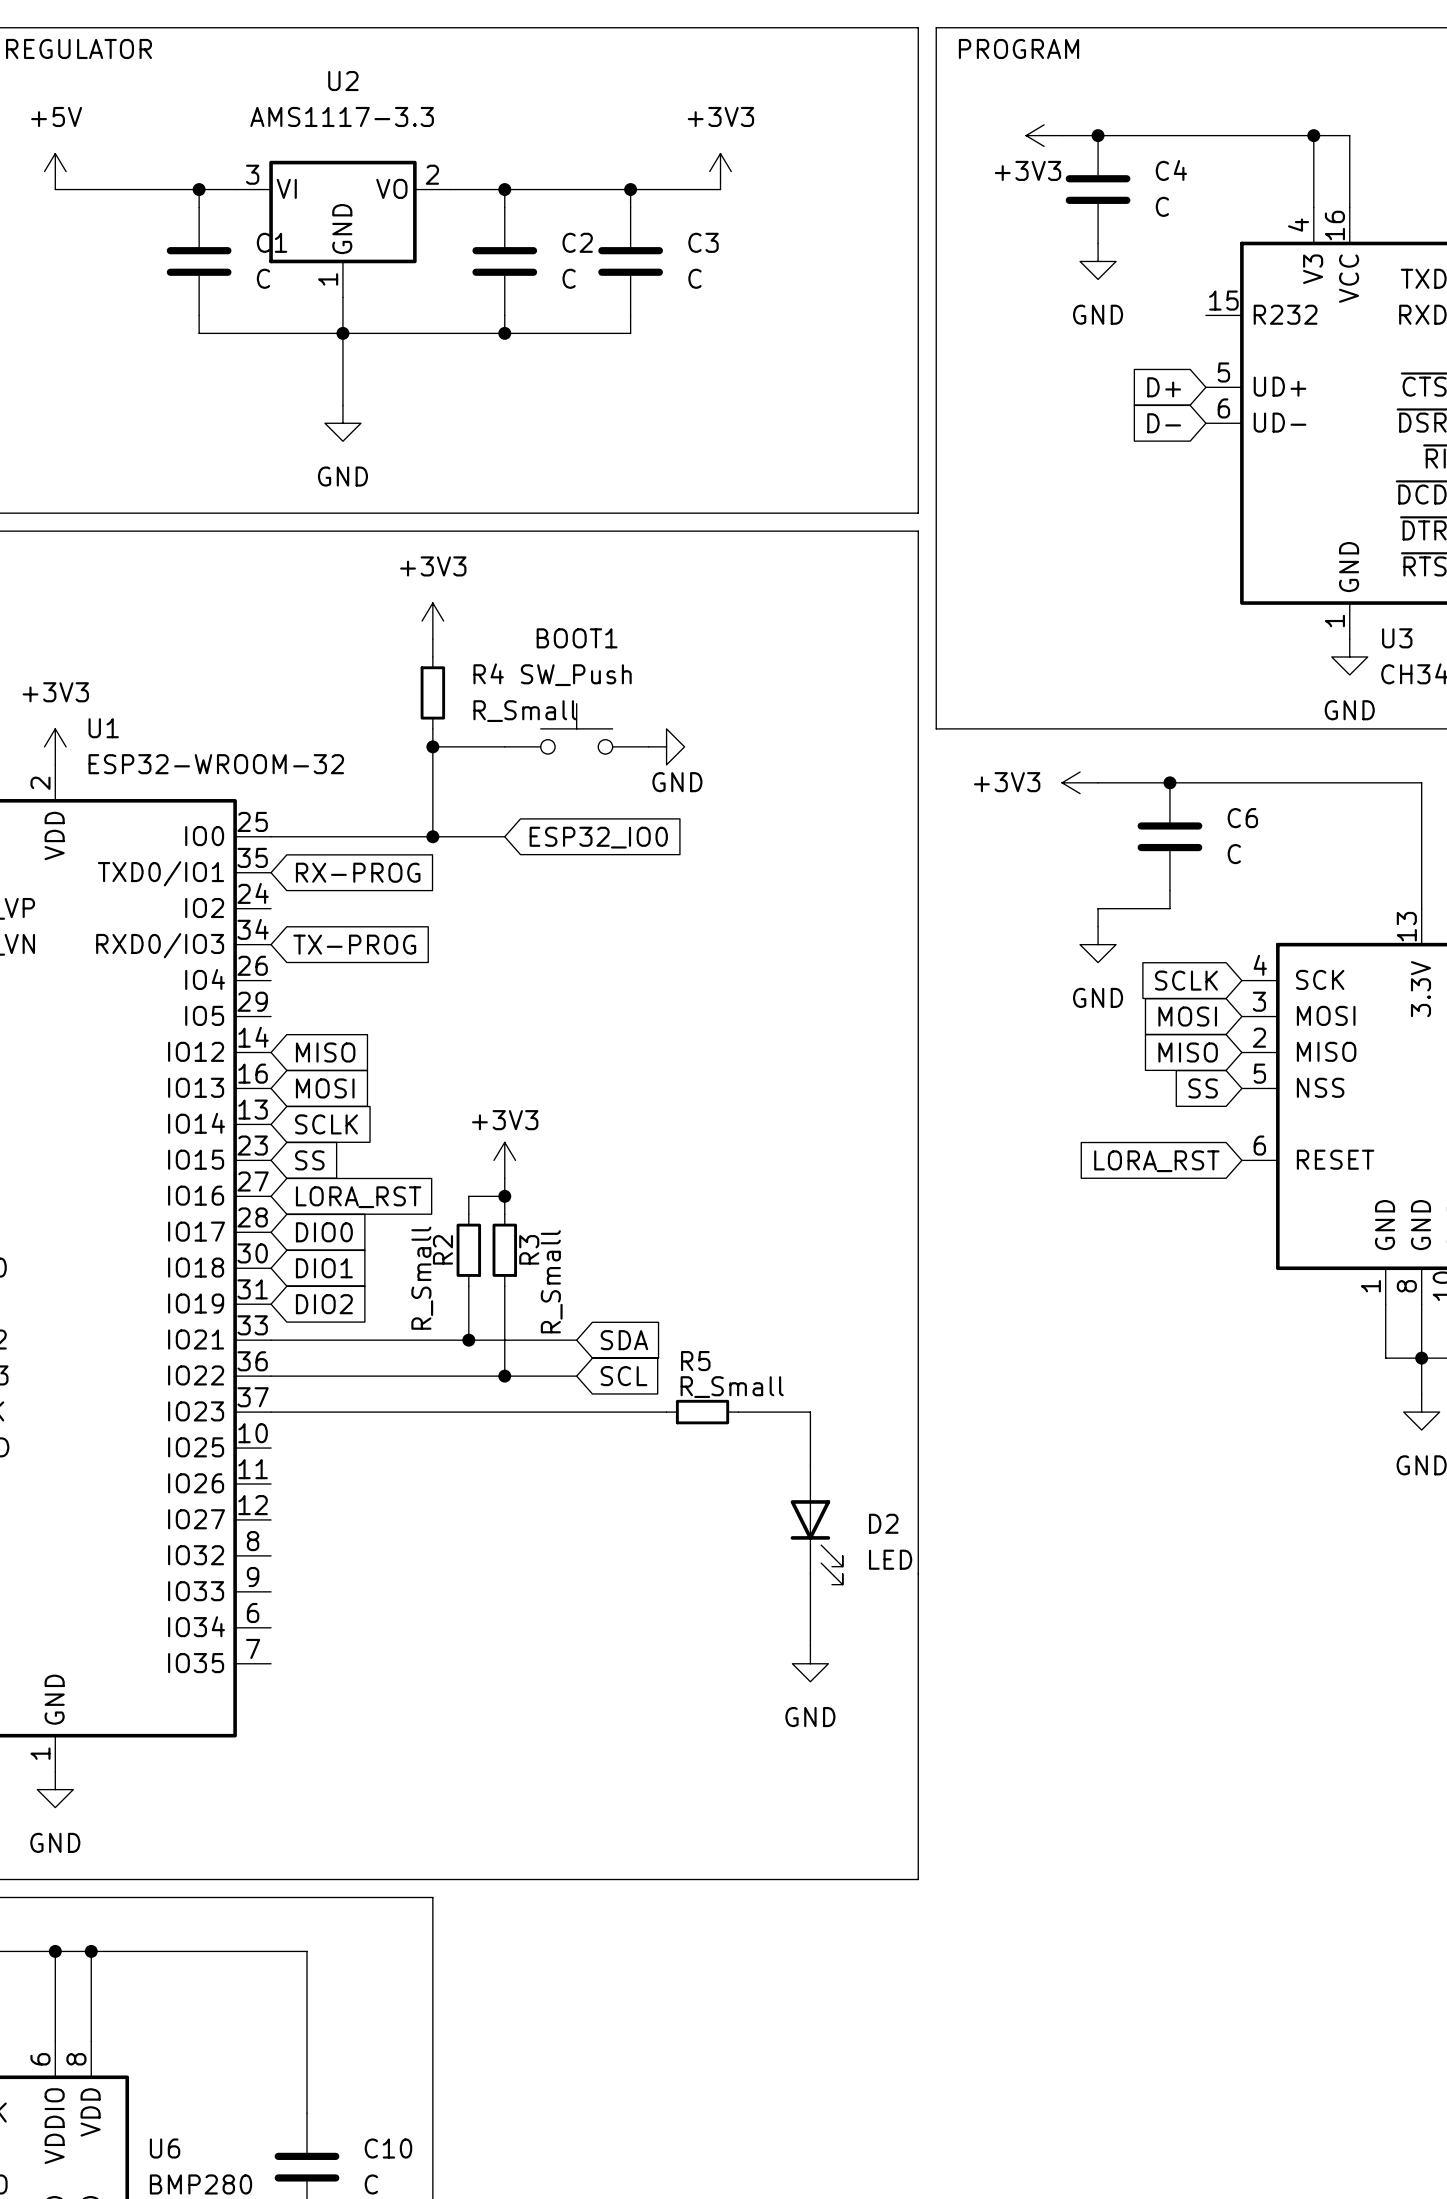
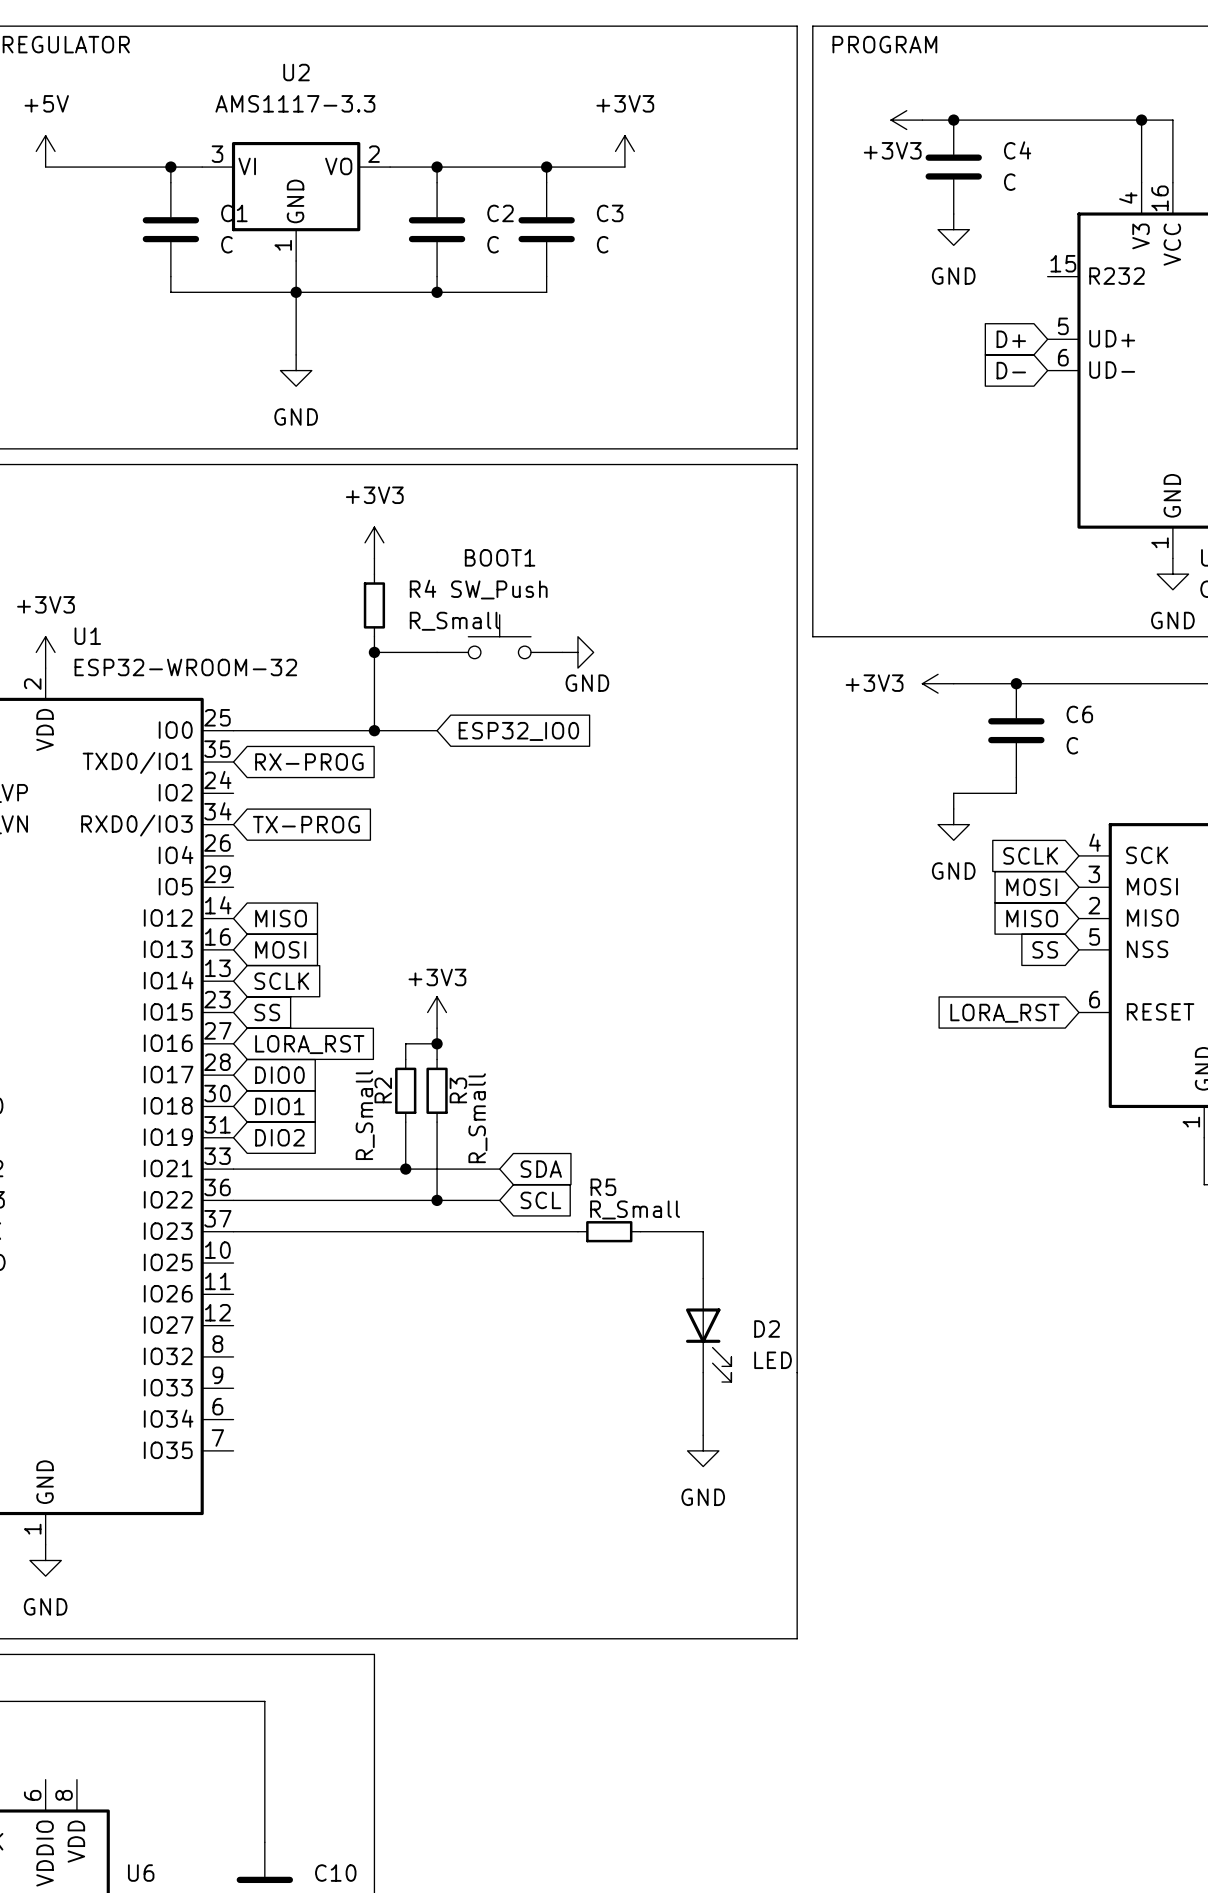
wire: (55, 1951) (55, 2041) -> none
junction: (55, 1951) -> none
wire: (91, 1951) (91, 2041) -> none
junction: (91, 1951) -> none

